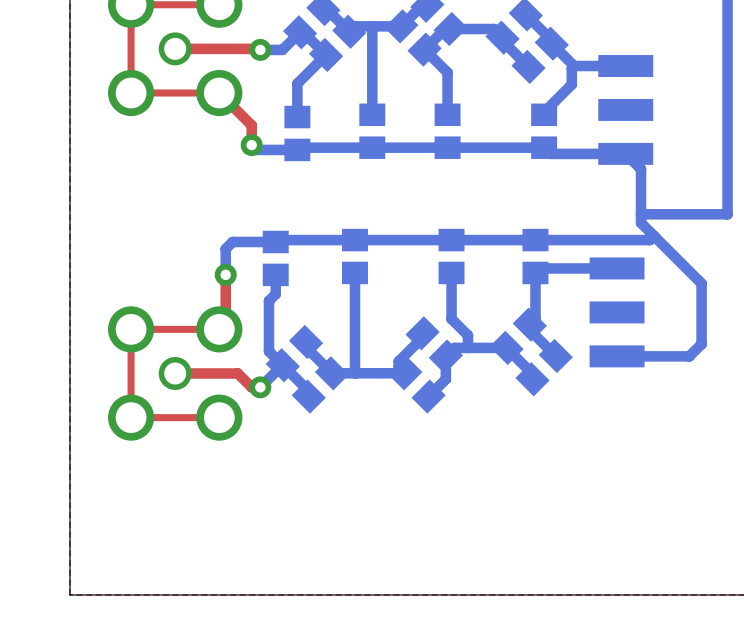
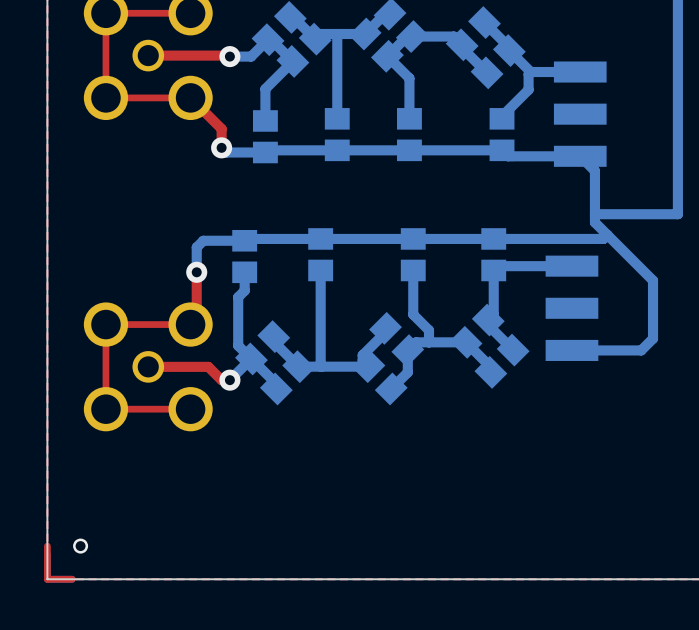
top track: none -> (47, 546) (47, 579) (72, 579)
via: none -> (80, 546)

